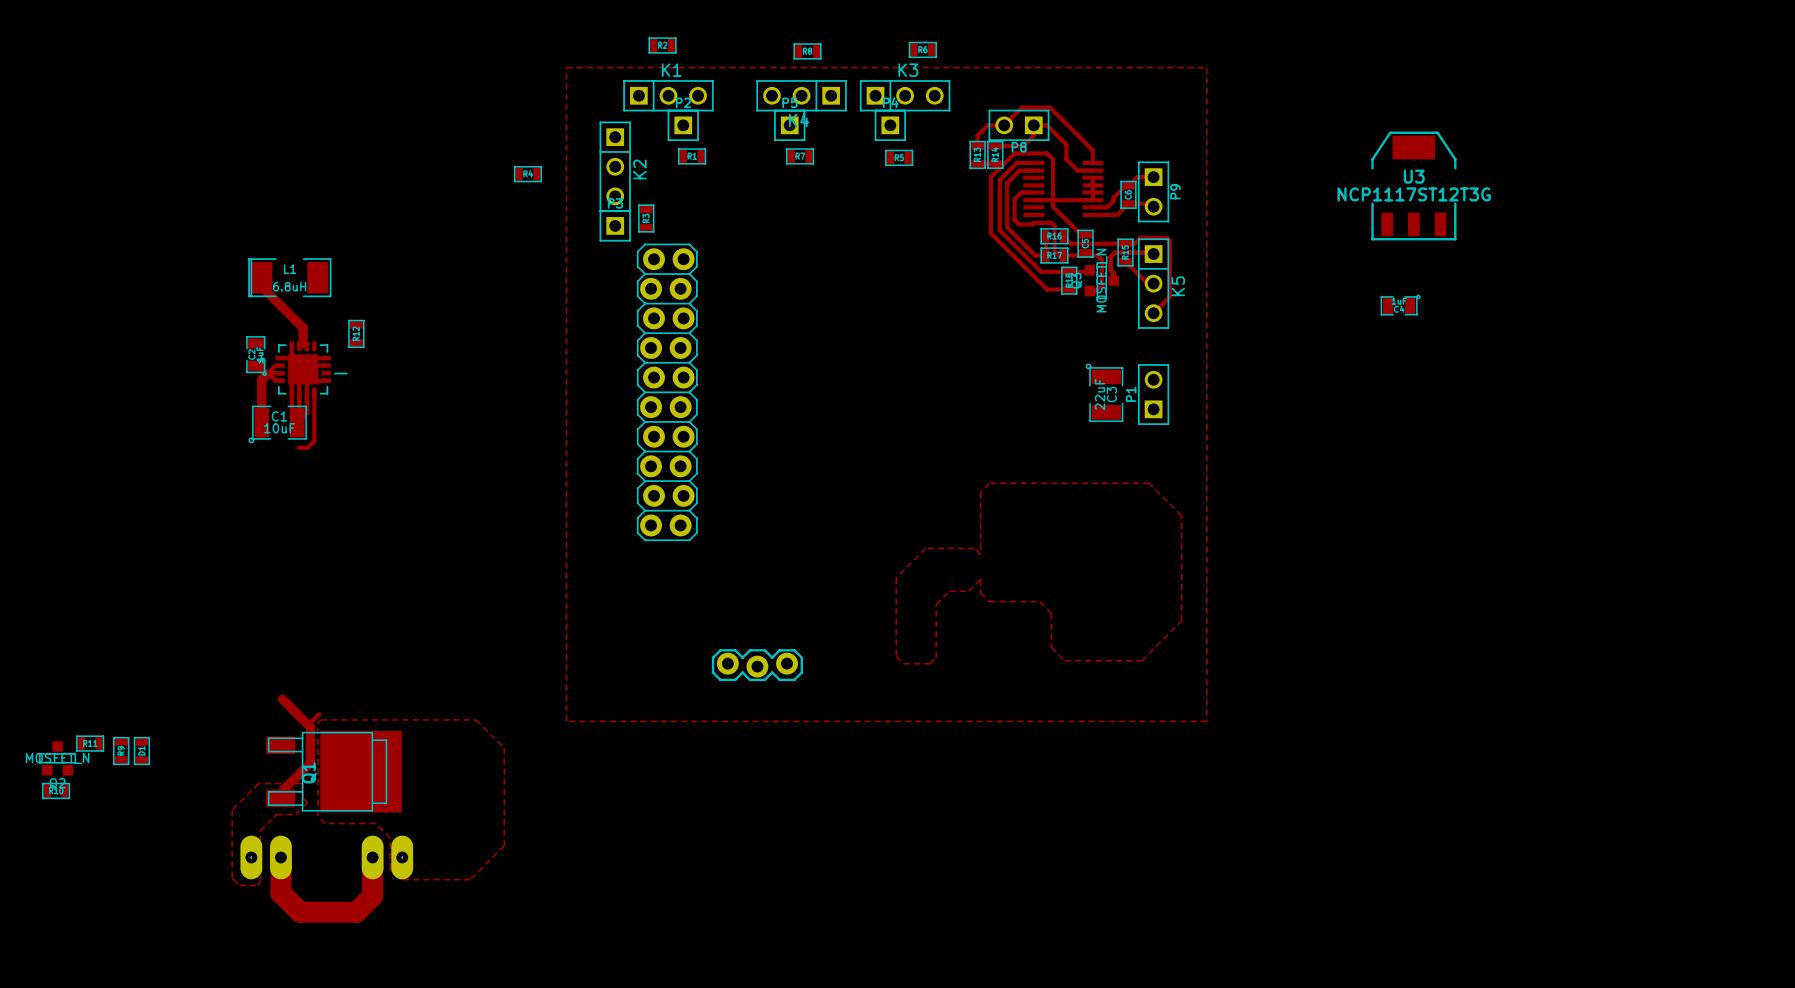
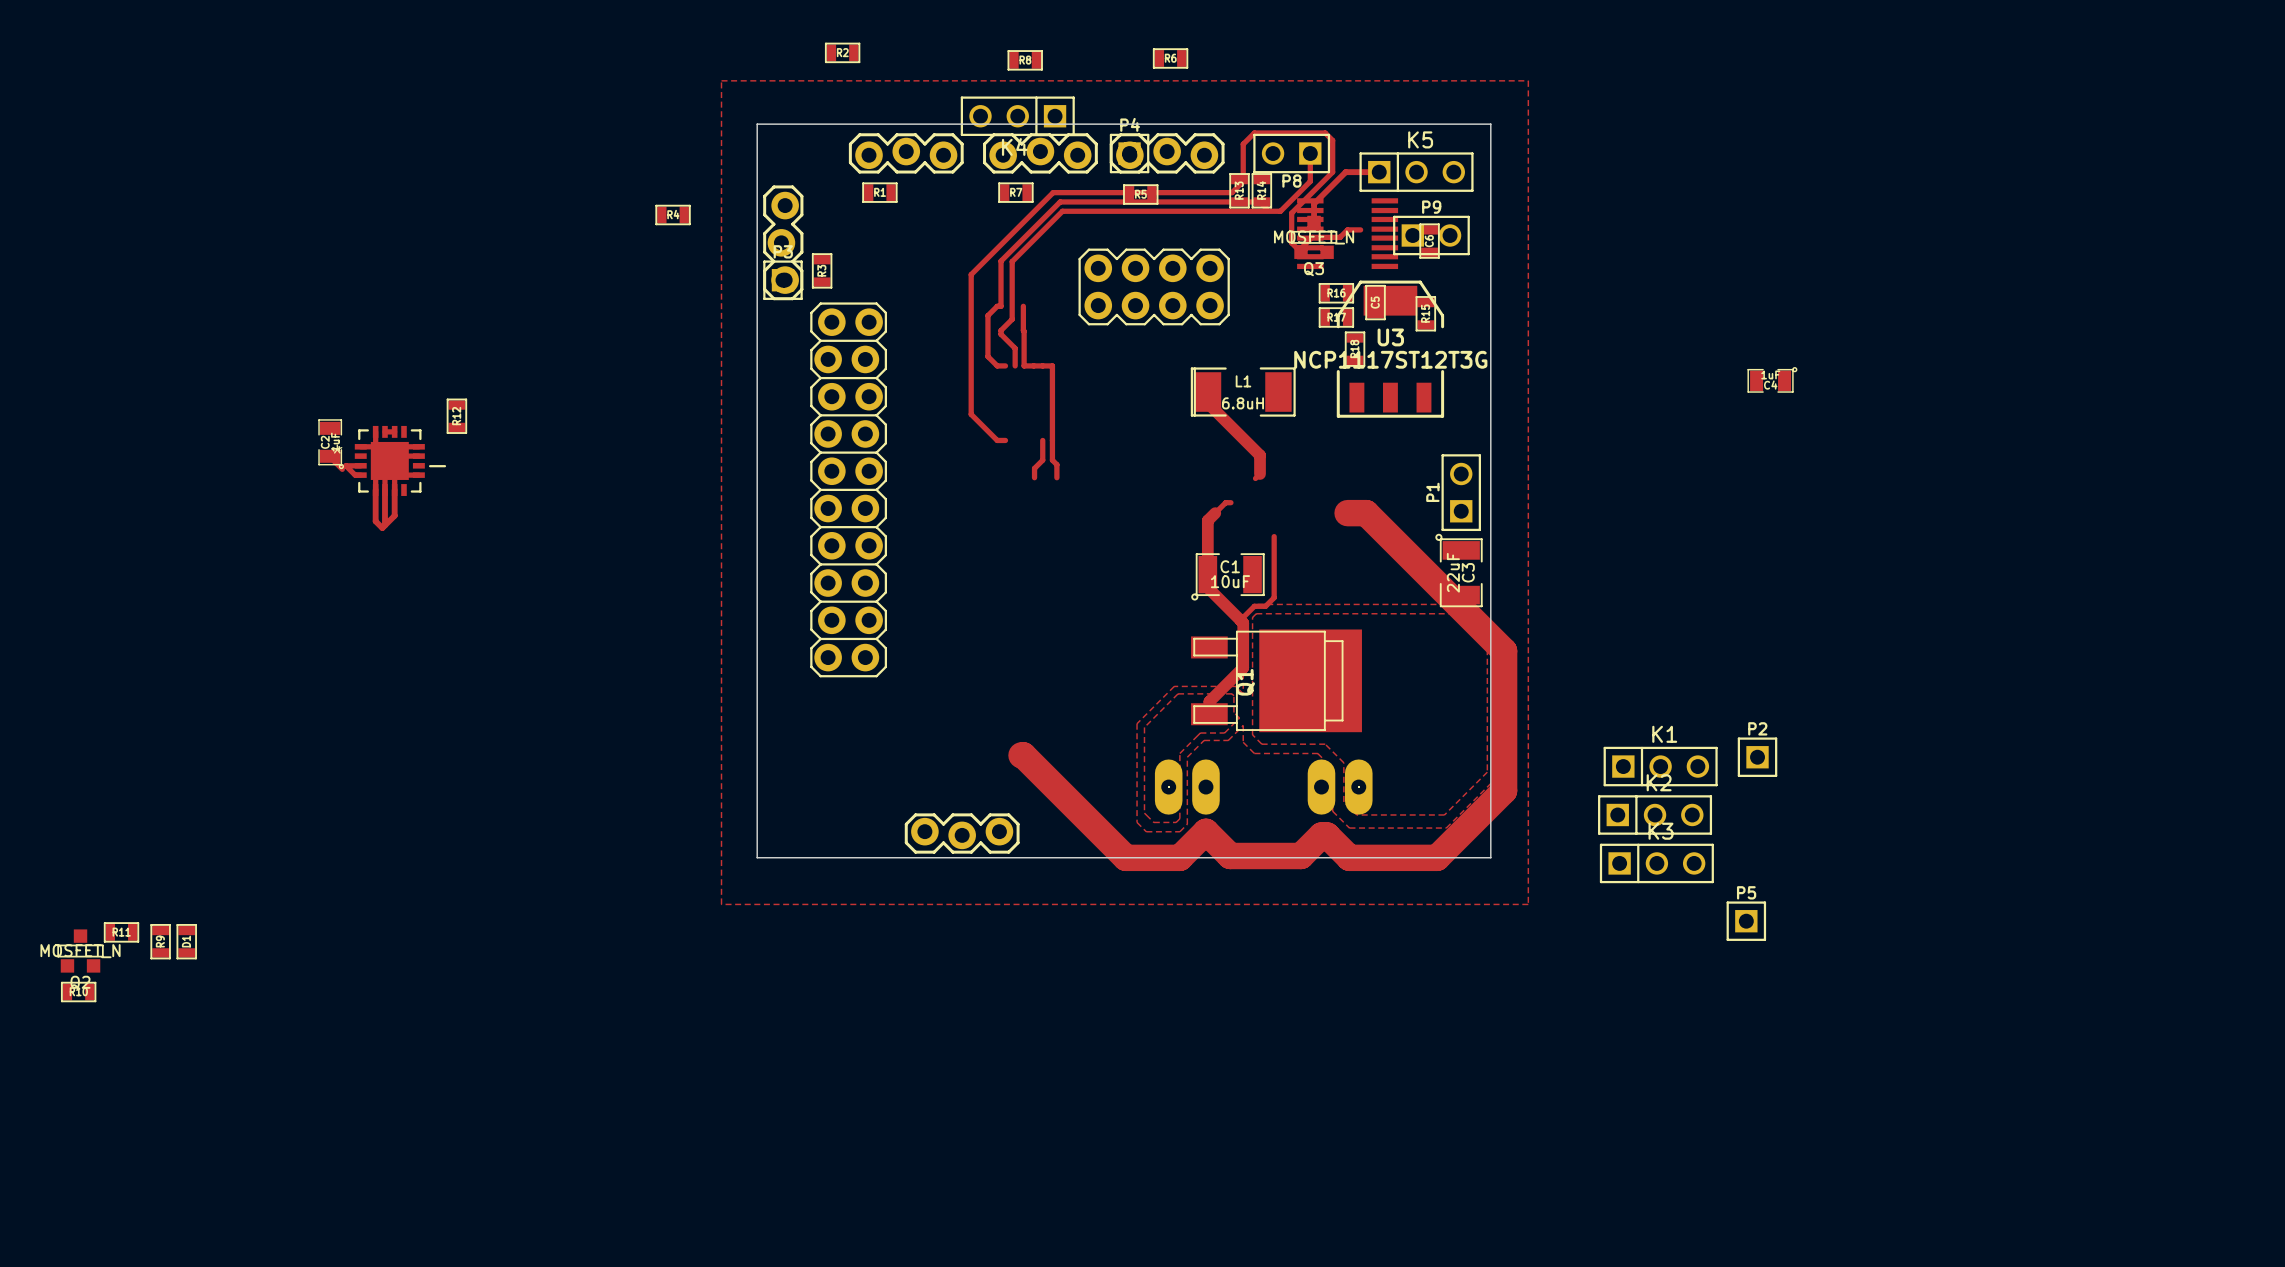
K1 position: (668, 95) -> (1660, 766)
K3 position: (905, 95) -> (1656, 863)
board edge: none -> (757, 124) (1490, 124) (1490, 857) (757, 857) (757, 124)
P2 position: (683, 125) -> (1757, 757)
part: none -> (906, 153)
P5 position: (789, 125) -> (1746, 921)
part: none -> (1040, 153)
part: none -> (1167, 153)
track: (1033, 125) (1047, 125) (1066, 144) (1066, 159) (1077, 170) (1092, 170) -> none
track: (1033, 135) (1023, 146) (995, 146) -> (1310, 166) (1310, 181) (1280, 211) (1062, 211) (1012, 261) (1012, 319) (1001, 330) (1001, 334) (1015, 348) (1015, 365)
track: none -> (1379, 172) (1345, 172) (1314, 203) (1314, 222)
track: (977, 146) (977, 135) (987, 125) (1004, 125) (1021, 107) (1050, 107) (1092, 150) (1092, 162) -> none
track: (1033, 162) (1016, 162) (999, 180) (999, 230) (1041, 271) (1090, 270) -> none
track: none -> (1239, 201) (1060, 201) (1001, 261) (1001, 306) (997, 306) (987, 315) (987, 356) (997, 365) (1005, 365)
K2 rotation: 0° (615, 166) -> 90° counterclockwise (1655, 814)
K2 position: (615, 166) -> (1655, 814)
track: (1033, 170) (1019, 170) (1007, 183) (1007, 227) (1035, 255) (1045, 255) (1045, 236) -> none
track: (1092, 177) (1092, 200) (1033, 200) -> none
track: (1153, 177) (1137, 177) (1128, 185) (1125, 185) (1107, 207) (1092, 207) -> none
track: none -> (1360, 229) (1347, 229) (1340, 237) (1312, 237) (1301, 248) (1301, 252) (1291, 242) (1291, 213) (1332, 172) (1332, 140) (1325, 133) (1254, 133) (1243, 144) (1243, 181) (1232, 192) (1053, 192) (971, 274) (971, 414) (997, 440) (1005, 440)
U3 position: (1413, 185) -> (1390, 349)
P9 rotation: 0° (1153, 191) -> 90° counterclockwise (1431, 235)
track: (1033, 192) (1021, 192) (1014, 199) (1014, 220) (1019, 224) (1051, 222) (1054, 225) (1054, 251) (1058, 255) (1097, 255) (1101, 259) (1101, 285) (1095, 291) (1090, 291) -> none
part: none -> (783, 242)
track: (1153, 206) (1150, 203) (1128, 203) (1117, 214) (1092, 214) -> none
part: none -> (1154, 286)
track: (1085, 234) (1081, 234) (1053, 206) (1053, 159) (1047, 153) (1014, 153) (990, 177) (990, 233) (1047, 289) (1069, 289) -> none
track: (1063, 236) (1070, 243) (1134, 243) (1140, 237) (1166, 237) (1169, 240) (1169, 296) (1153, 313) -> none
track: none -> (1023, 306) (1024, 365) (1052, 365) (1052, 460) (1056, 464) (1056, 477)
track: (1153, 254) (1115, 252) (1110, 256) (1110, 270) (1113, 273) (1113, 280) -> none
track: (1125, 261) (1147, 283) (1153, 283) -> none
track: (261, 277) (261, 286) (303, 327) (303, 342) (299, 346) -> none
L1 position: (289, 277) -> (1243, 392)
Q3 rotation: 0° (1101, 280) -> 90° counterclockwise (1314, 237)
Q3 position: (1101, 280) -> (1314, 237)
K5 rotation: 0° (1153, 283) -> 90° counterclockwise (1416, 172)
K5 position: (1153, 283) -> (1416, 172)
track: none -> (1208, 392) (1208, 403) (1260, 455) (1260, 474) (1255, 478)
track: none -> (1042, 440) (1042, 460) (1034, 468) (1034, 477)
track: (280, 365) (275, 365) (261, 379) (261, 432) -> none
track: (314, 392) (314, 440) (307, 447) (298, 447) -> none
C3 position: (1104, 392) -> (1459, 570)
track: none -> (1230, 502) (1225, 502) (1207, 520) (1207, 587) (1243, 623) (1243, 667) (1209, 701) (1209, 714)
track: none -> (1347, 513) (1366, 513) (1504, 651) (1504, 790) (1437, 857) (1349, 857) (1327, 835) (1321, 835) (1301, 855) (1230, 855) (1205, 831) (1179, 857) (1125, 857) (1021, 755)
C1 position: (277, 424) -> (1227, 576)
track: none -> (1274, 536) (1274, 597) (1265, 606) (1254, 606) (1240, 620)
zone outline: none -> (1256, 613) (1252, 617) (1252, 734) (1261, 744) (1325, 744) (1343, 762) (1343, 801) (1356, 814) (1444, 814) (1487, 772) (1487, 649) (1451, 613) (1256, 613)
zone outline: none -> (1178, 693) (1232, 693) (1233, 695) (1233, 712) (1239, 718) (1224, 733) (1200, 733) (1179, 753) (1179, 818) (1176, 822) (1153, 822) (1144, 813) (1144, 727) (1178, 693)
track: (282, 699) (310, 727) (310, 762) (283, 789) (283, 799) -> none
track: (319, 714) (308, 725) -> none
zone outline: (320, 719) (317, 722) (317, 816) (325, 823) (375, 823) (390, 838) (390, 869) (400, 879) (470, 879) (504, 845) (504, 748) (476, 719) (320, 719) -> none
Q1 position: (333, 771) -> (1276, 680)
zone outline: (258, 783) (301, 783) (303, 798) (307, 802) (295, 814) (276, 814) (260, 830) (260, 882) (257, 885) (239, 885) (232, 878) (232, 810) (258, 783) -> none
part position: (266, 857) -> (1187, 787)
track: (280, 857) (280, 892) (300, 912) (356, 912) (372, 895) (372, 857) -> none
part position: (387, 857) -> (1340, 787)

